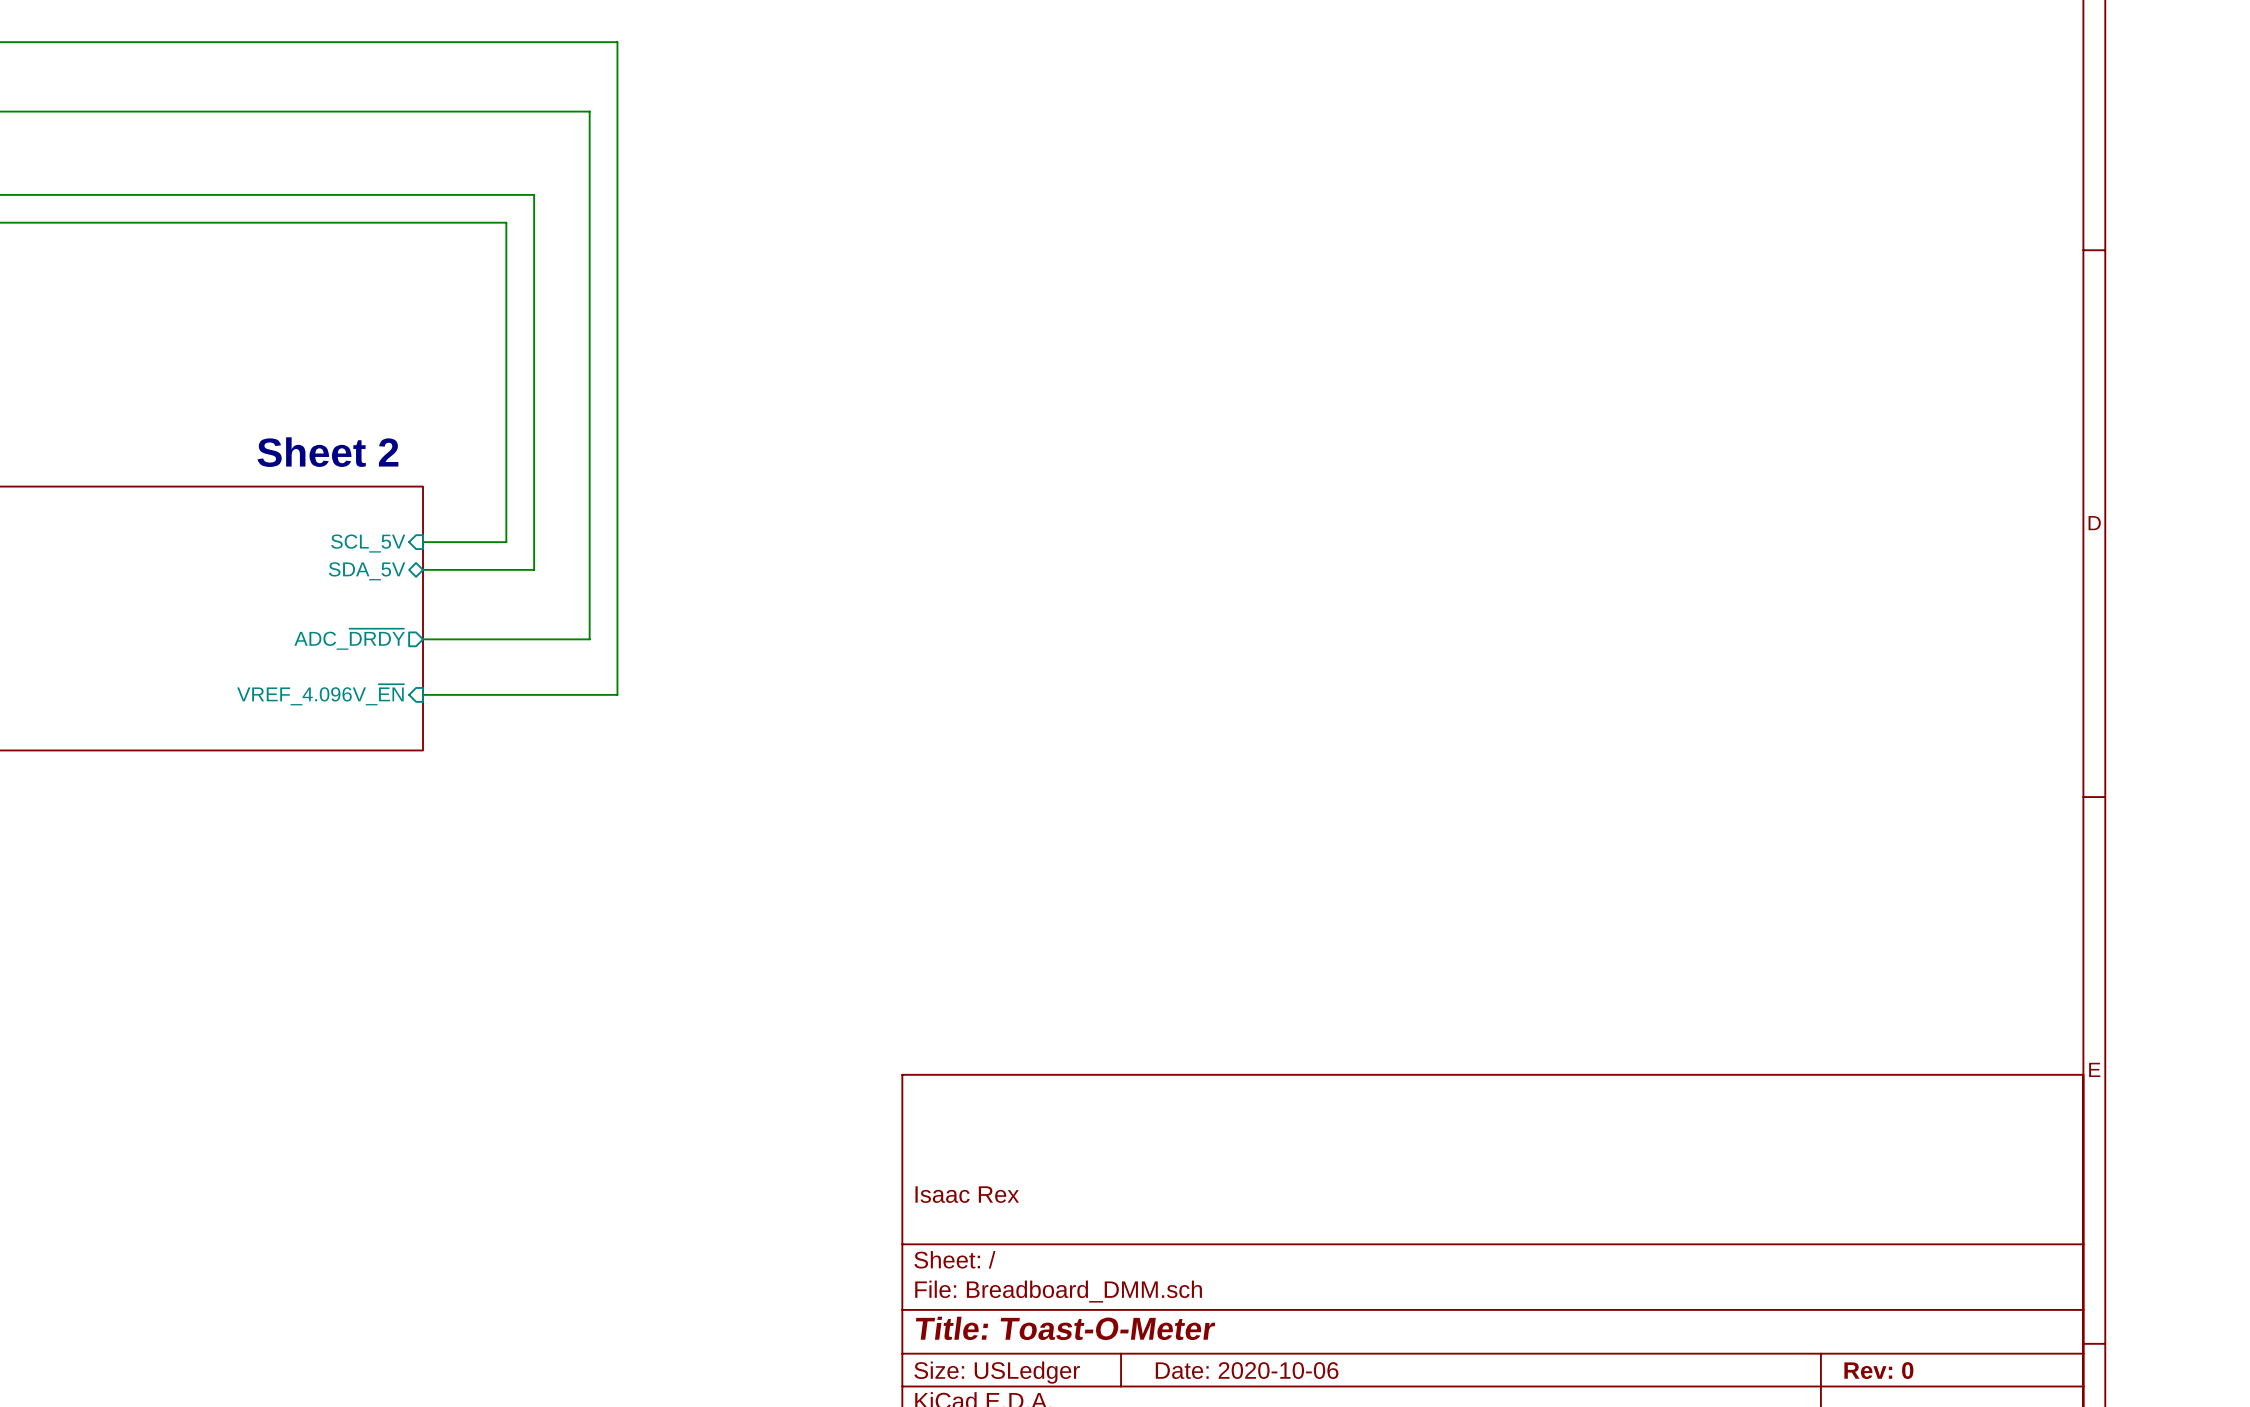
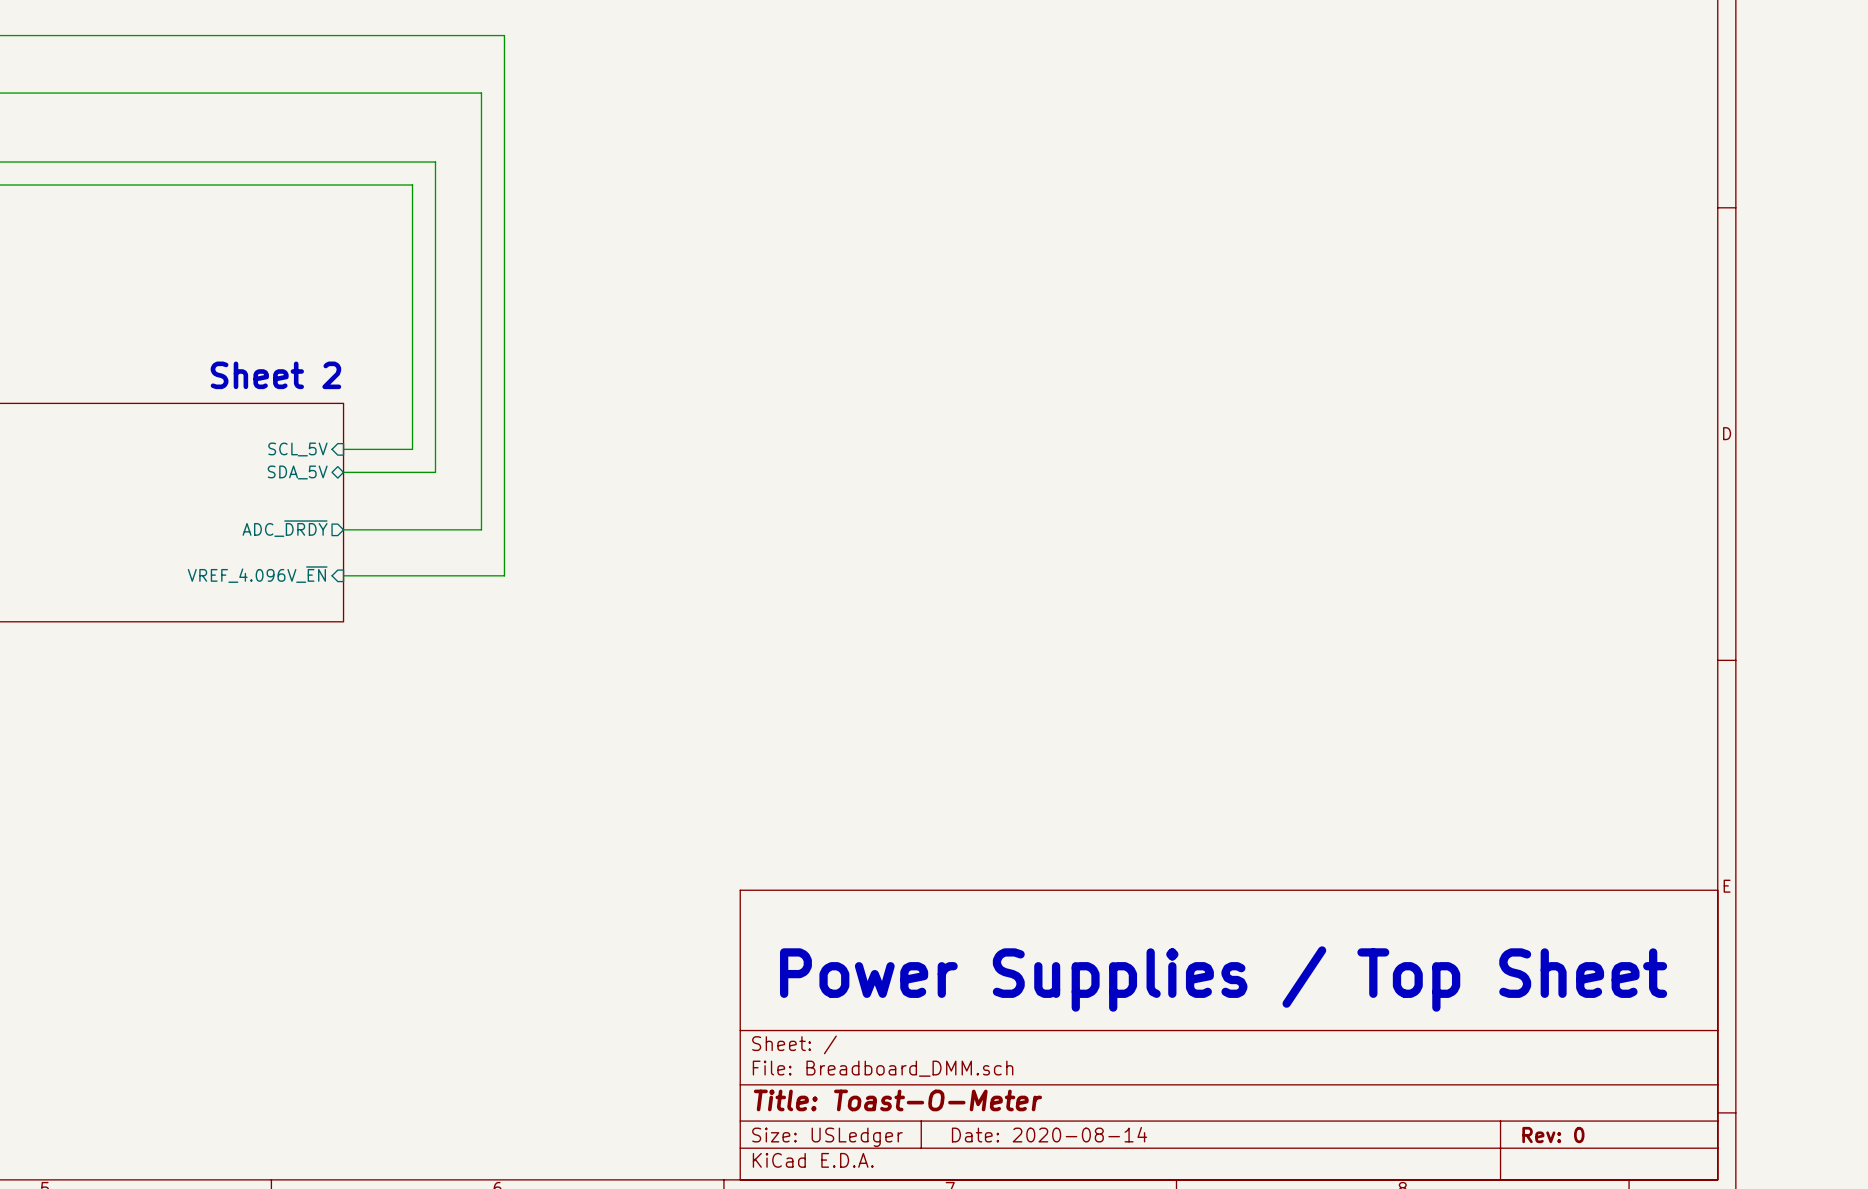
text: none -> Power Supplies / Top Sheet (1223, 979)
title block: Isaac Rex (967, 1194) -> none
title block: Date: 2020-10-06 (1247, 1370) -> Date: 2020-08-14 (1049, 1134)

